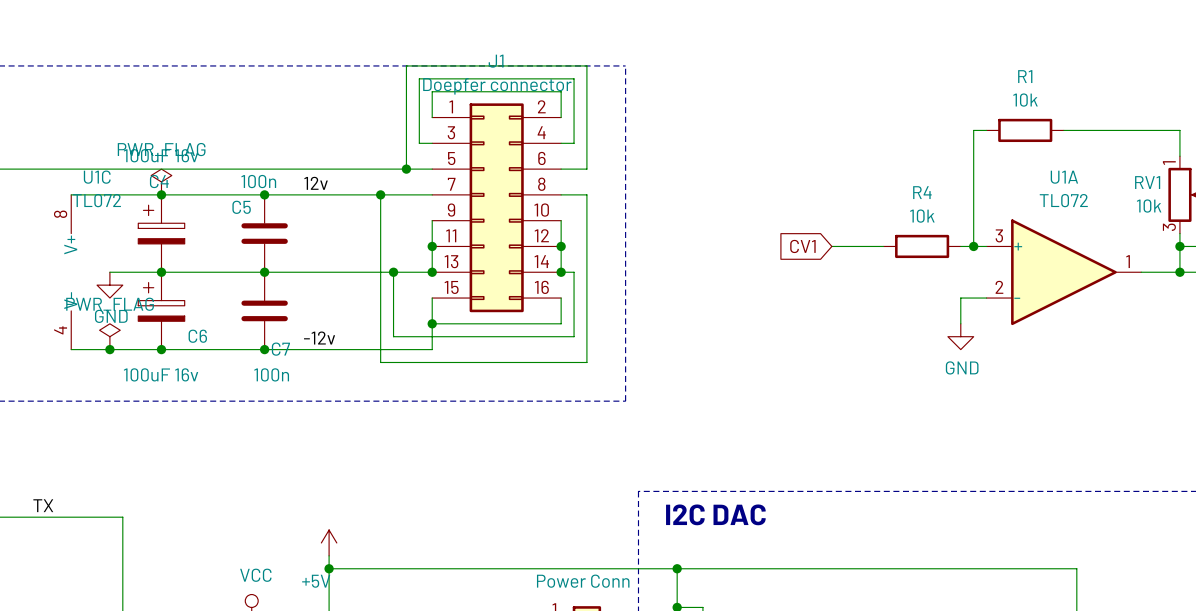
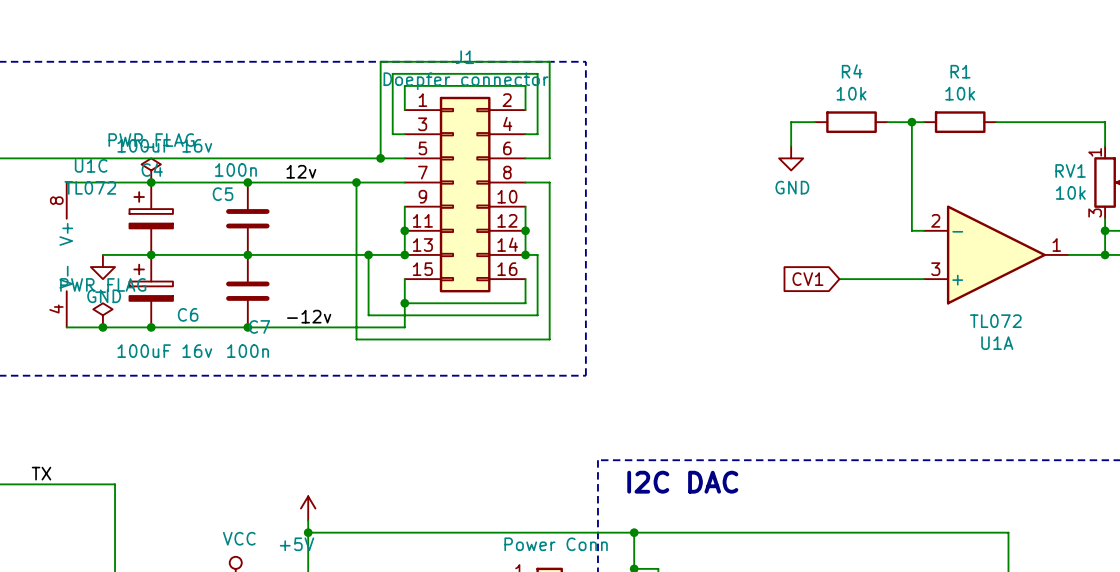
wire: none -> (815, 122) (791, 122) (791, 146)
wire: none -> (887, 122) (911, 122)
junction: none -> (911, 122)
global label position: CV1 (802, 246) -> CV1 (807, 279)
wire: (831, 246) (883, 246) -> none
R4 position: (922, 246) -> (851, 122)
wire: (960, 246) (973, 246) -> none
junction: (973, 246) -> none
U1A flip: as is (1063, 272) -> up-down (996, 254)
wire: (960, 298) (960, 323) -> (899, 279) (839, 279)
power symbol position: GND (960, 336) -> GND (791, 158)

